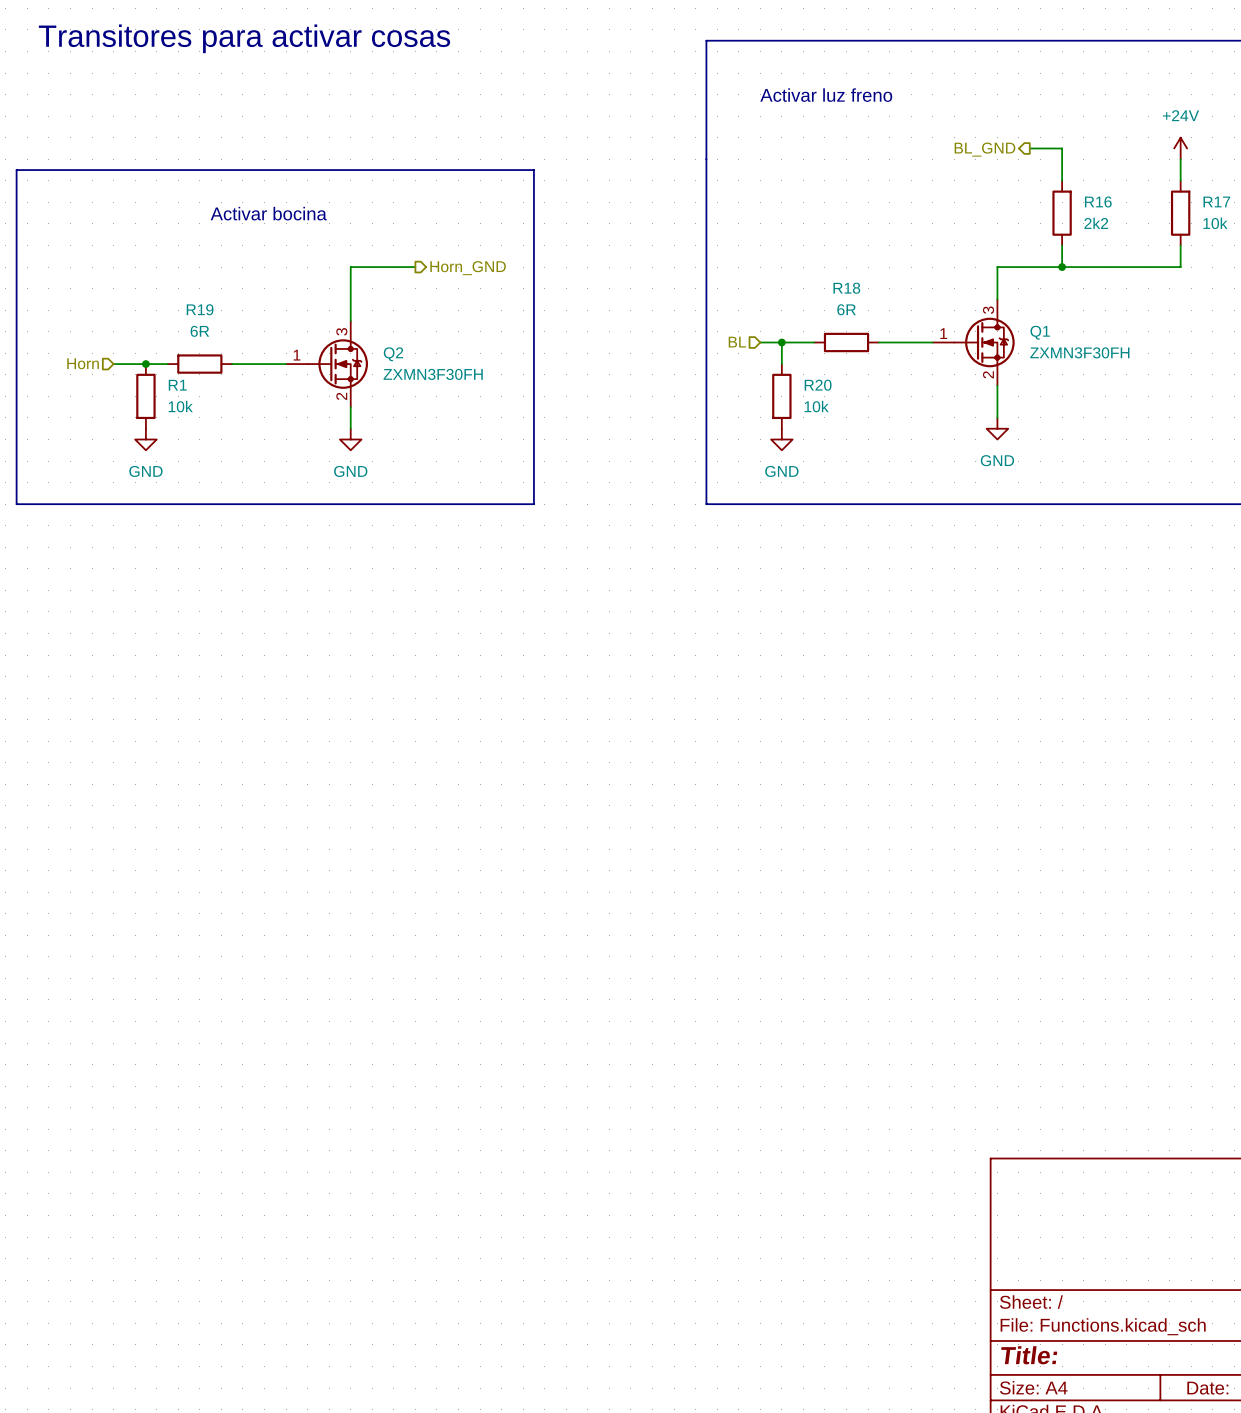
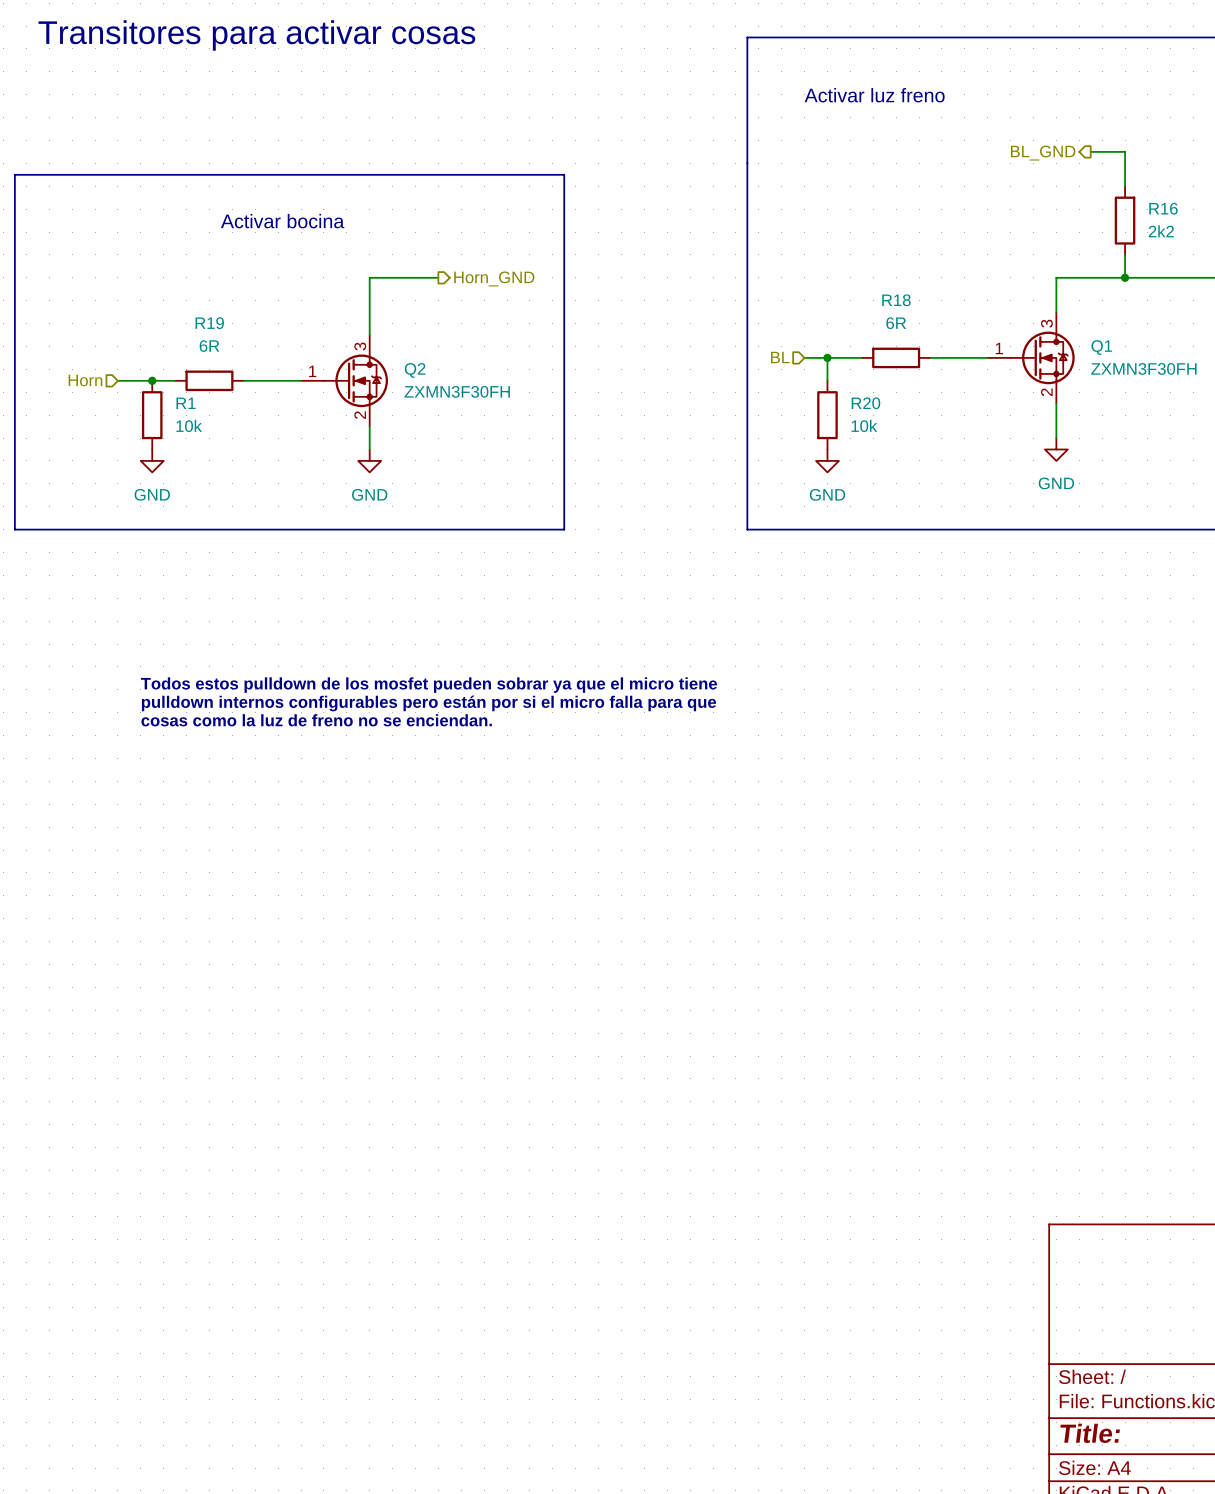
text: none -> Todos estos pulldown de los mosfet pueden sobrar ya que el micro tiene (429, 685)
text: none -> pulldown internos configurables pero están por si el micro falla para que (428, 703)
text: none -> cosas como la luz de freno no se enciendan. (316, 720)

